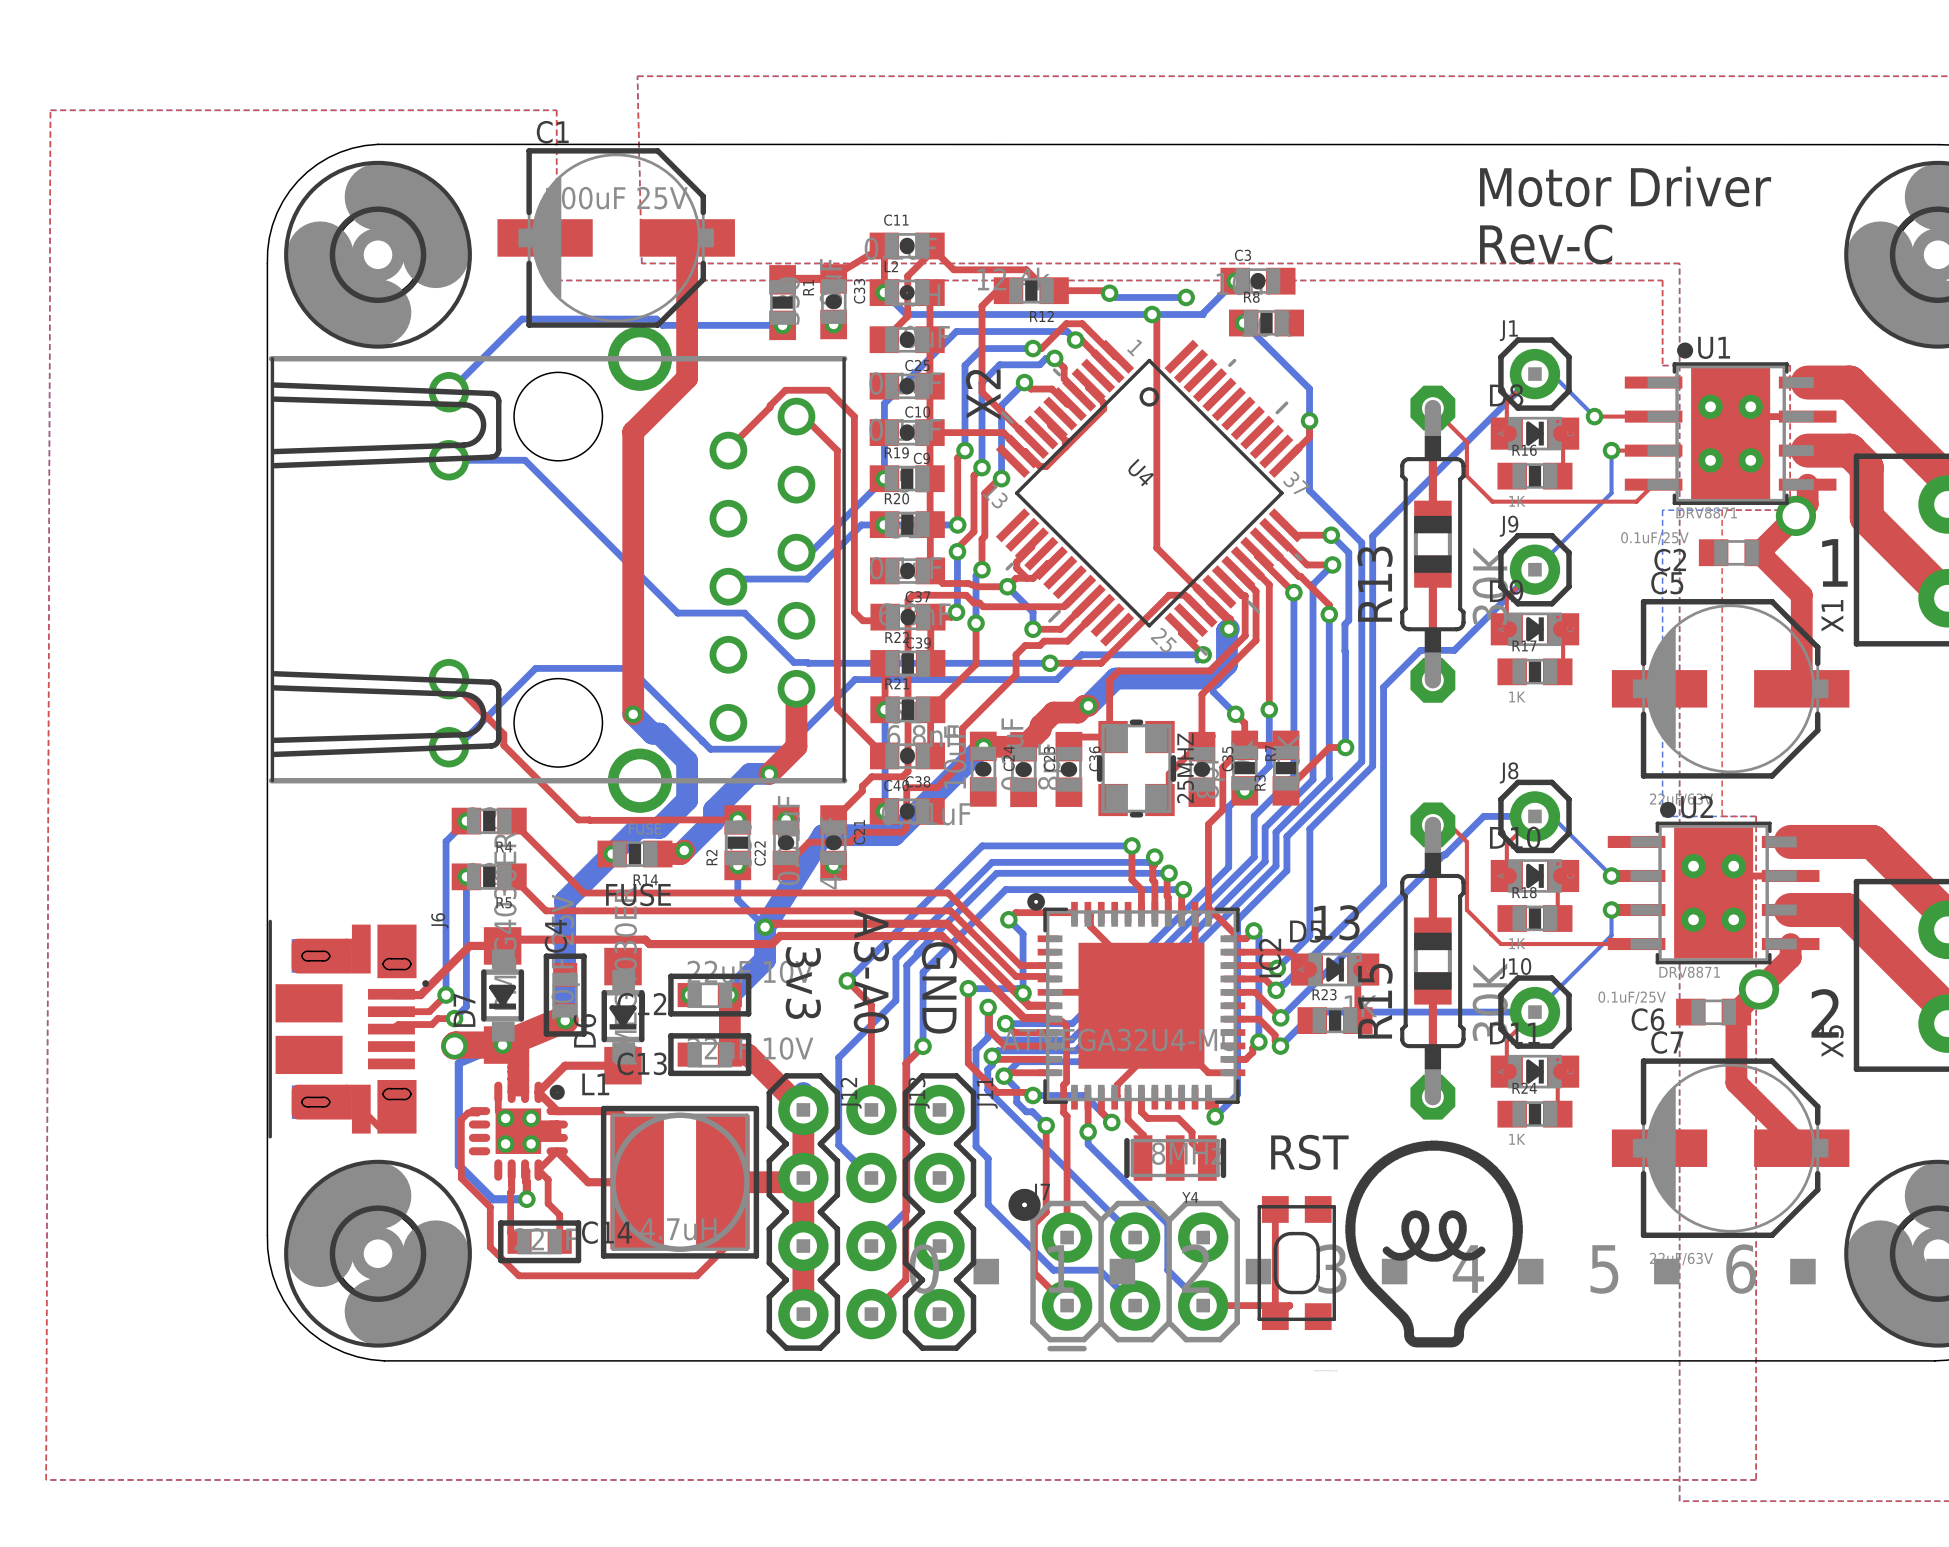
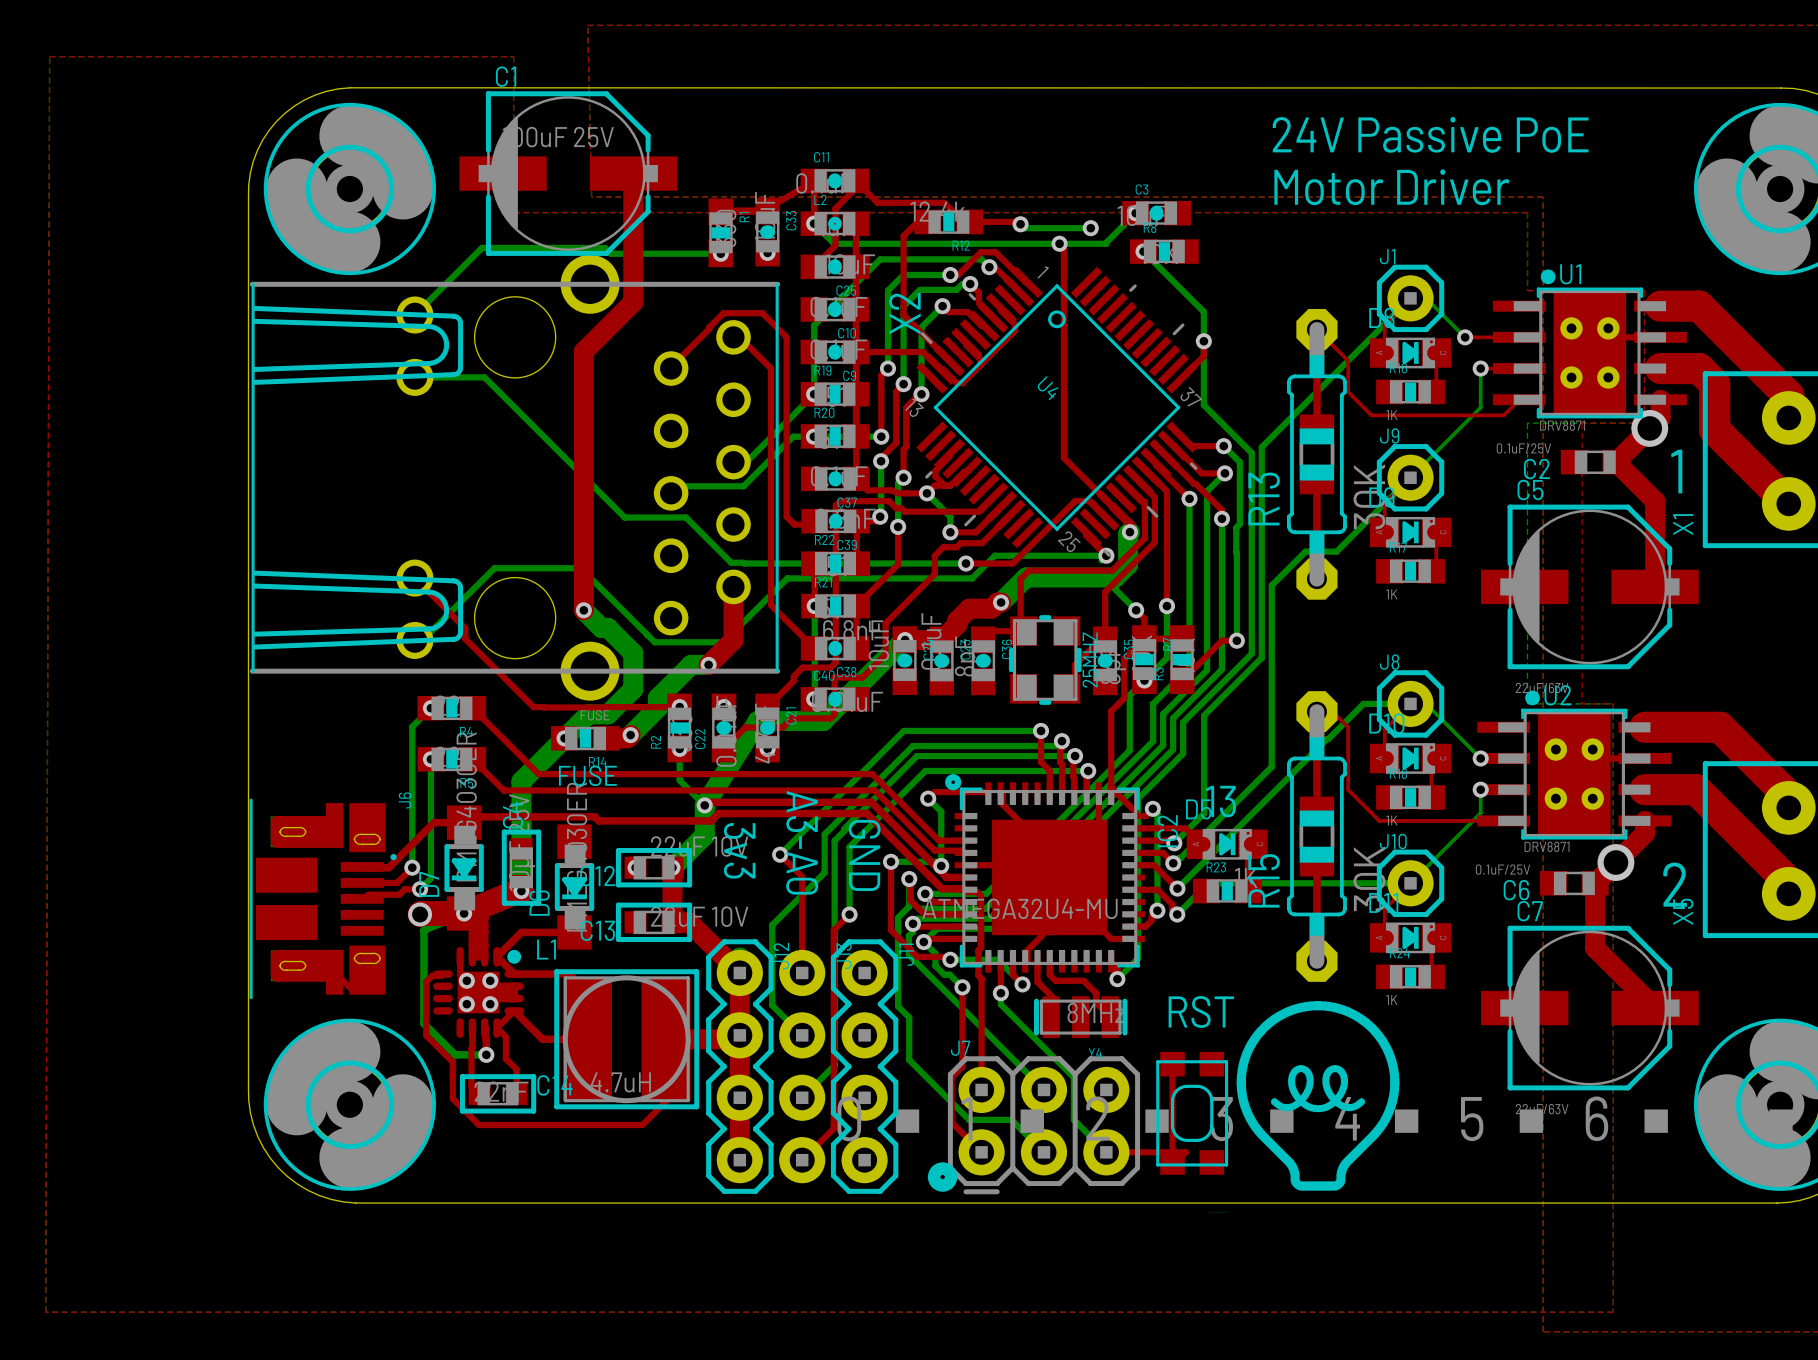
text position: Motor Driver (1625, 186) -> Motor Driver (1391, 187)
text: none -> 24V Passive PoE (1430, 134)
text: Rev-C (1546, 244) -> none
drawing position: (1024, 1204) -> (942, 1177)

